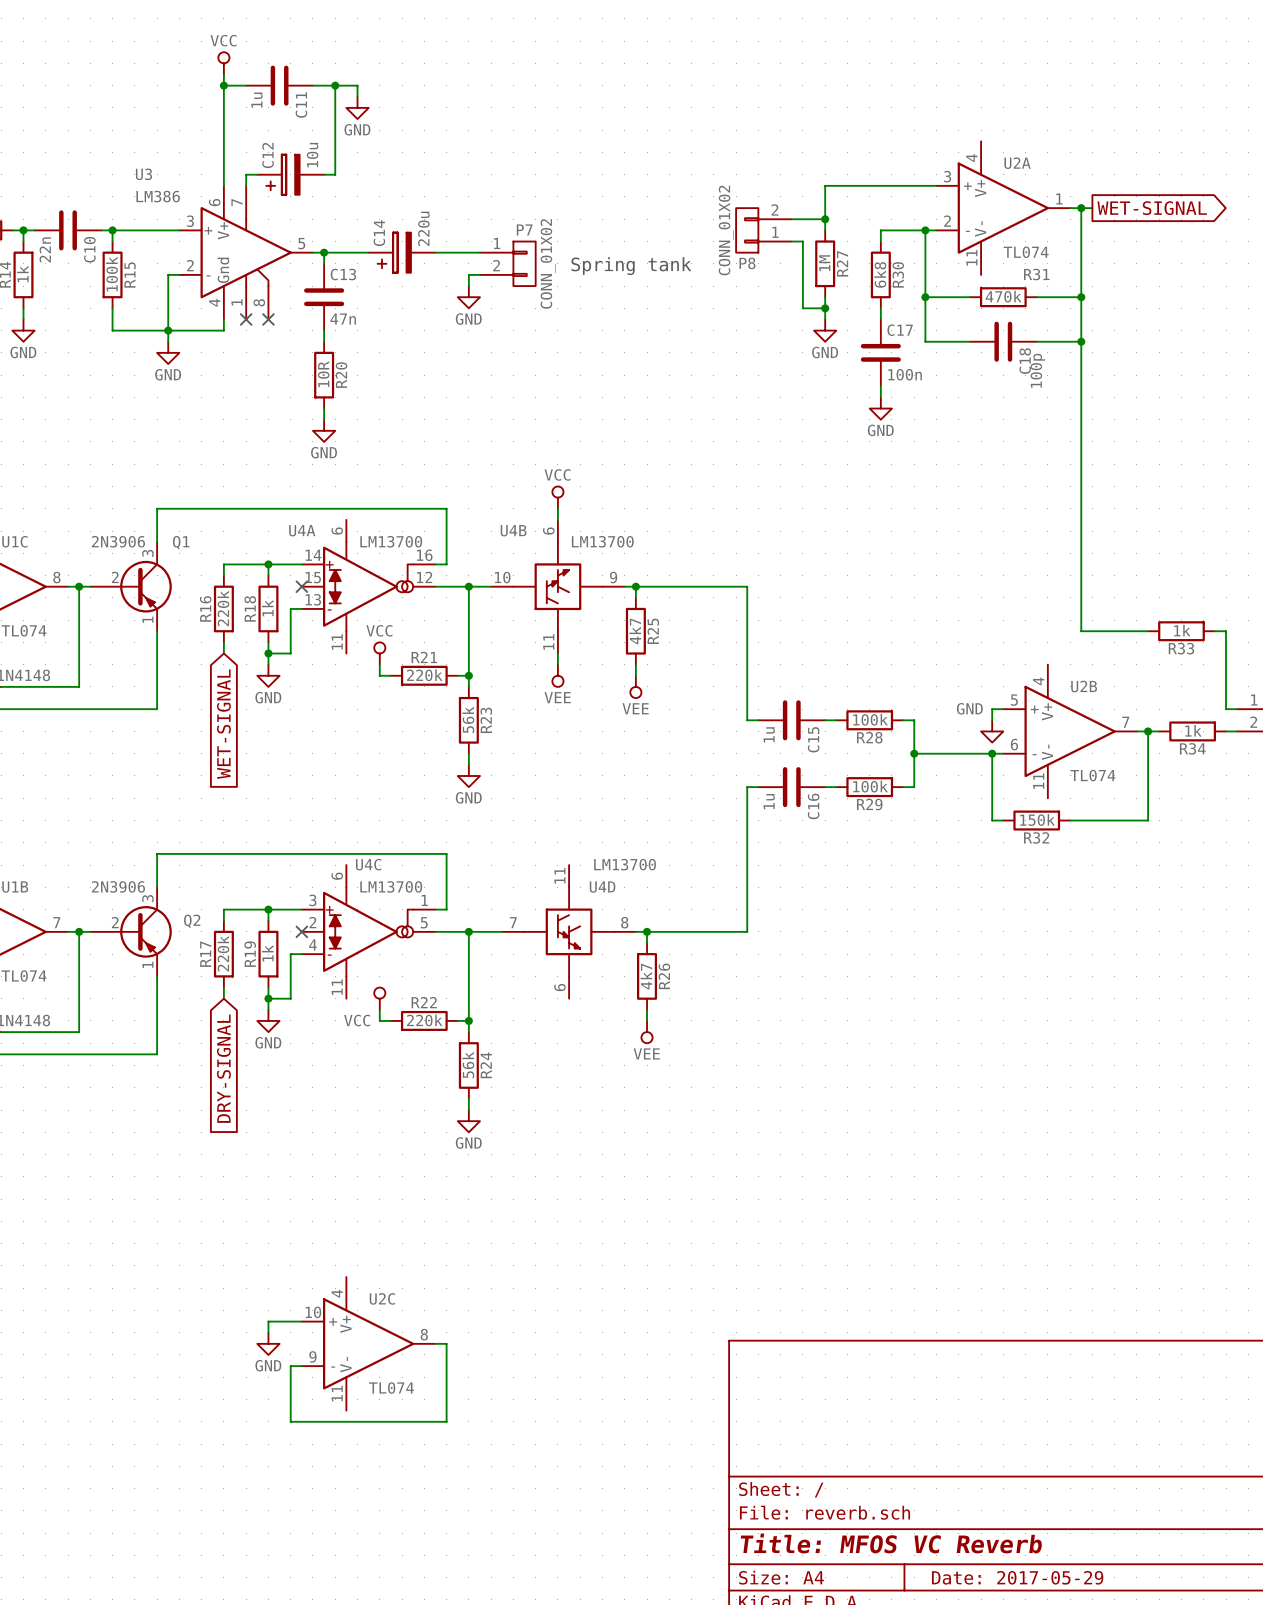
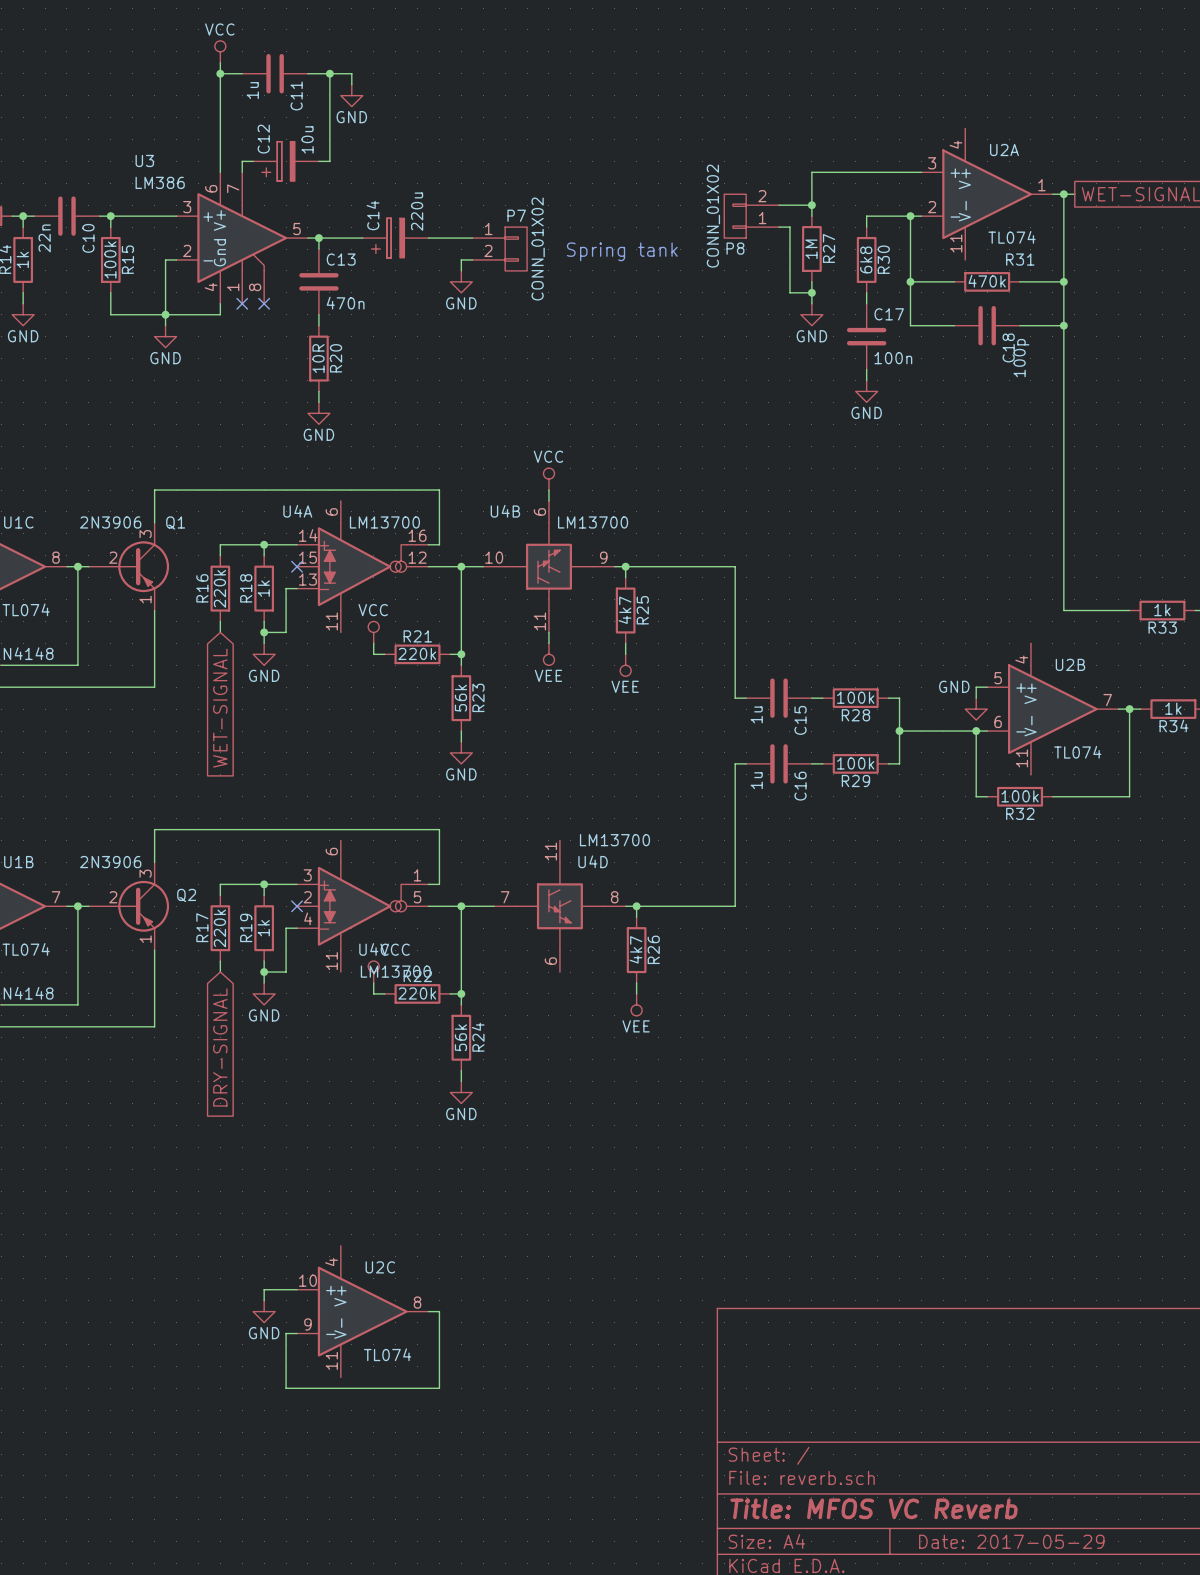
C13 value: 47n (343, 319) -> 470n (345, 303)
R32 value: 150k (1037, 819) -> 100k (1020, 796)
U4C name position: U4C (368, 864) -> U4C (373, 949)
U4C value position: LM13700 (391, 886) -> LM13700 (395, 971)
power symbol text position: VCC (357, 1020) -> VCC (395, 949)

